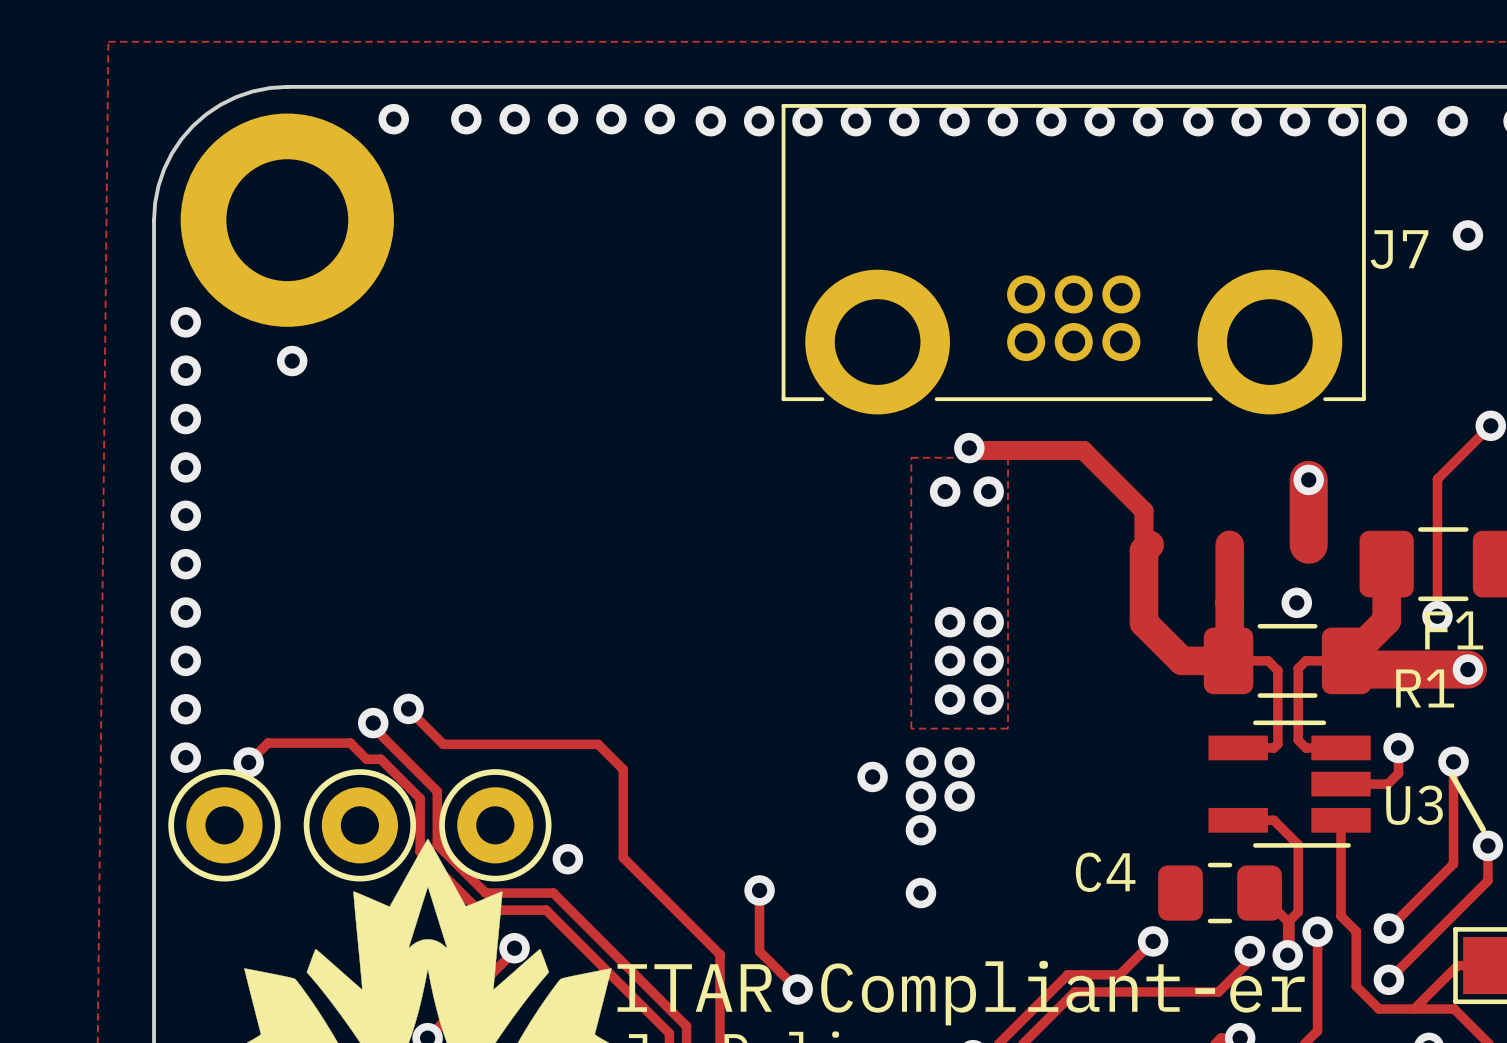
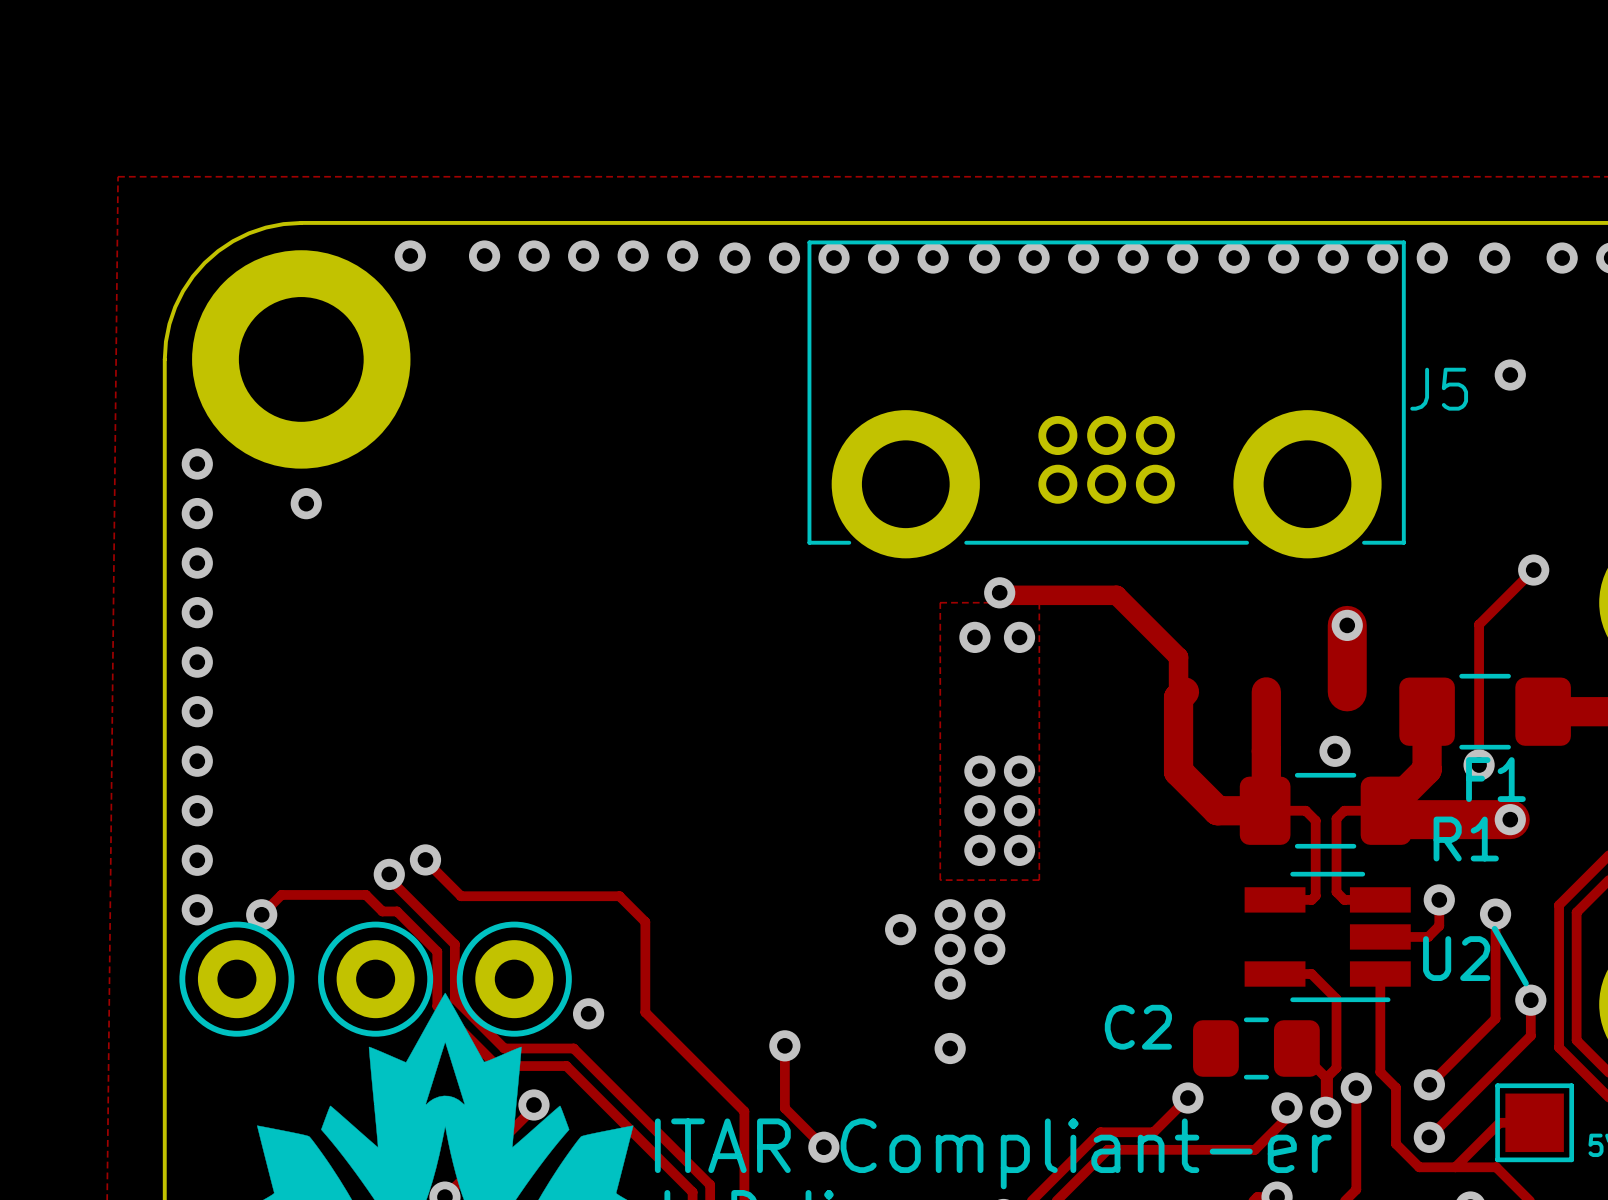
J7 name: J7 (1399, 249) -> J5 (1439, 389)
U3 name: U3 (1414, 805) -> U2 (1456, 958)
C4 name: C4 (1105, 872) -> C2 (1138, 1027)

